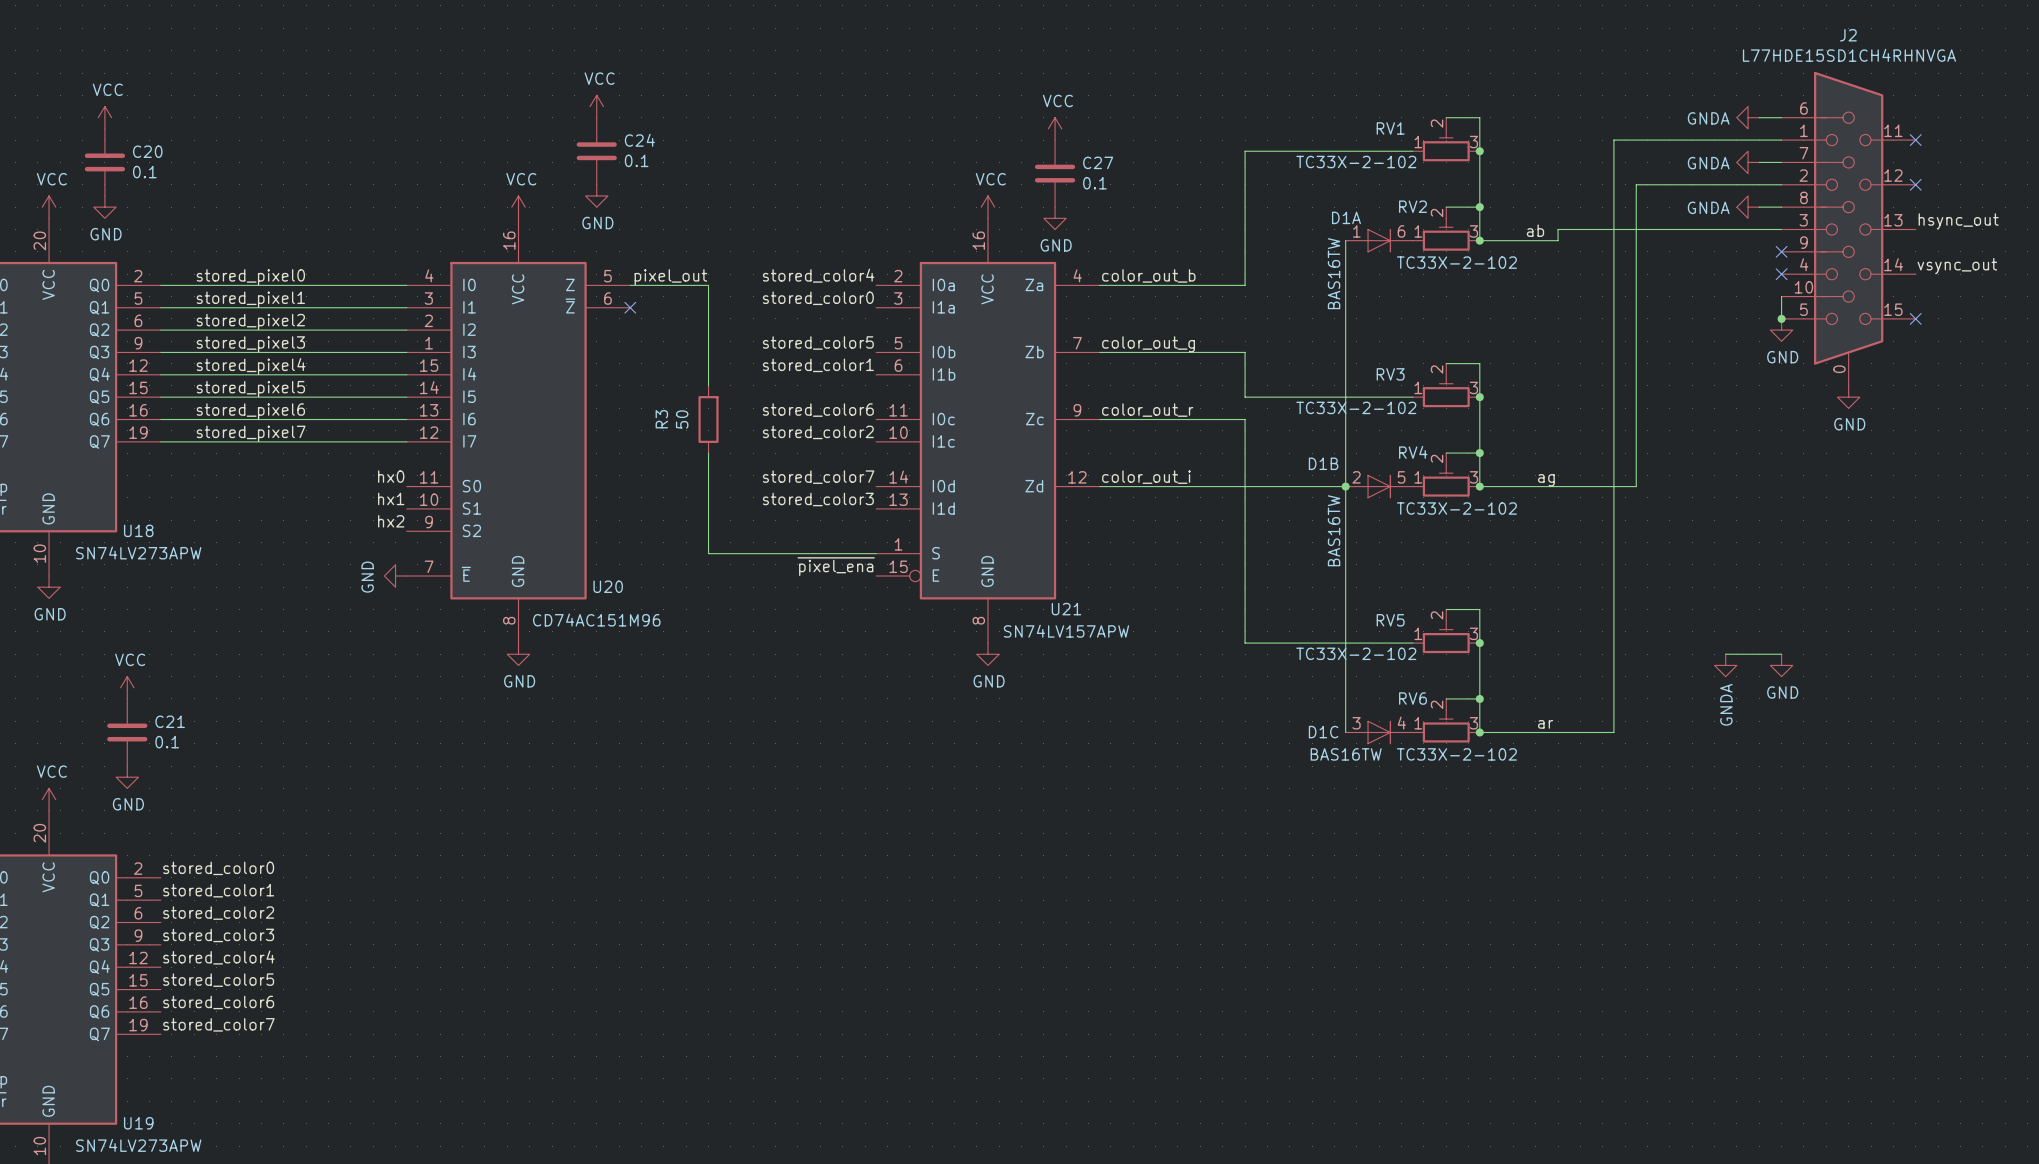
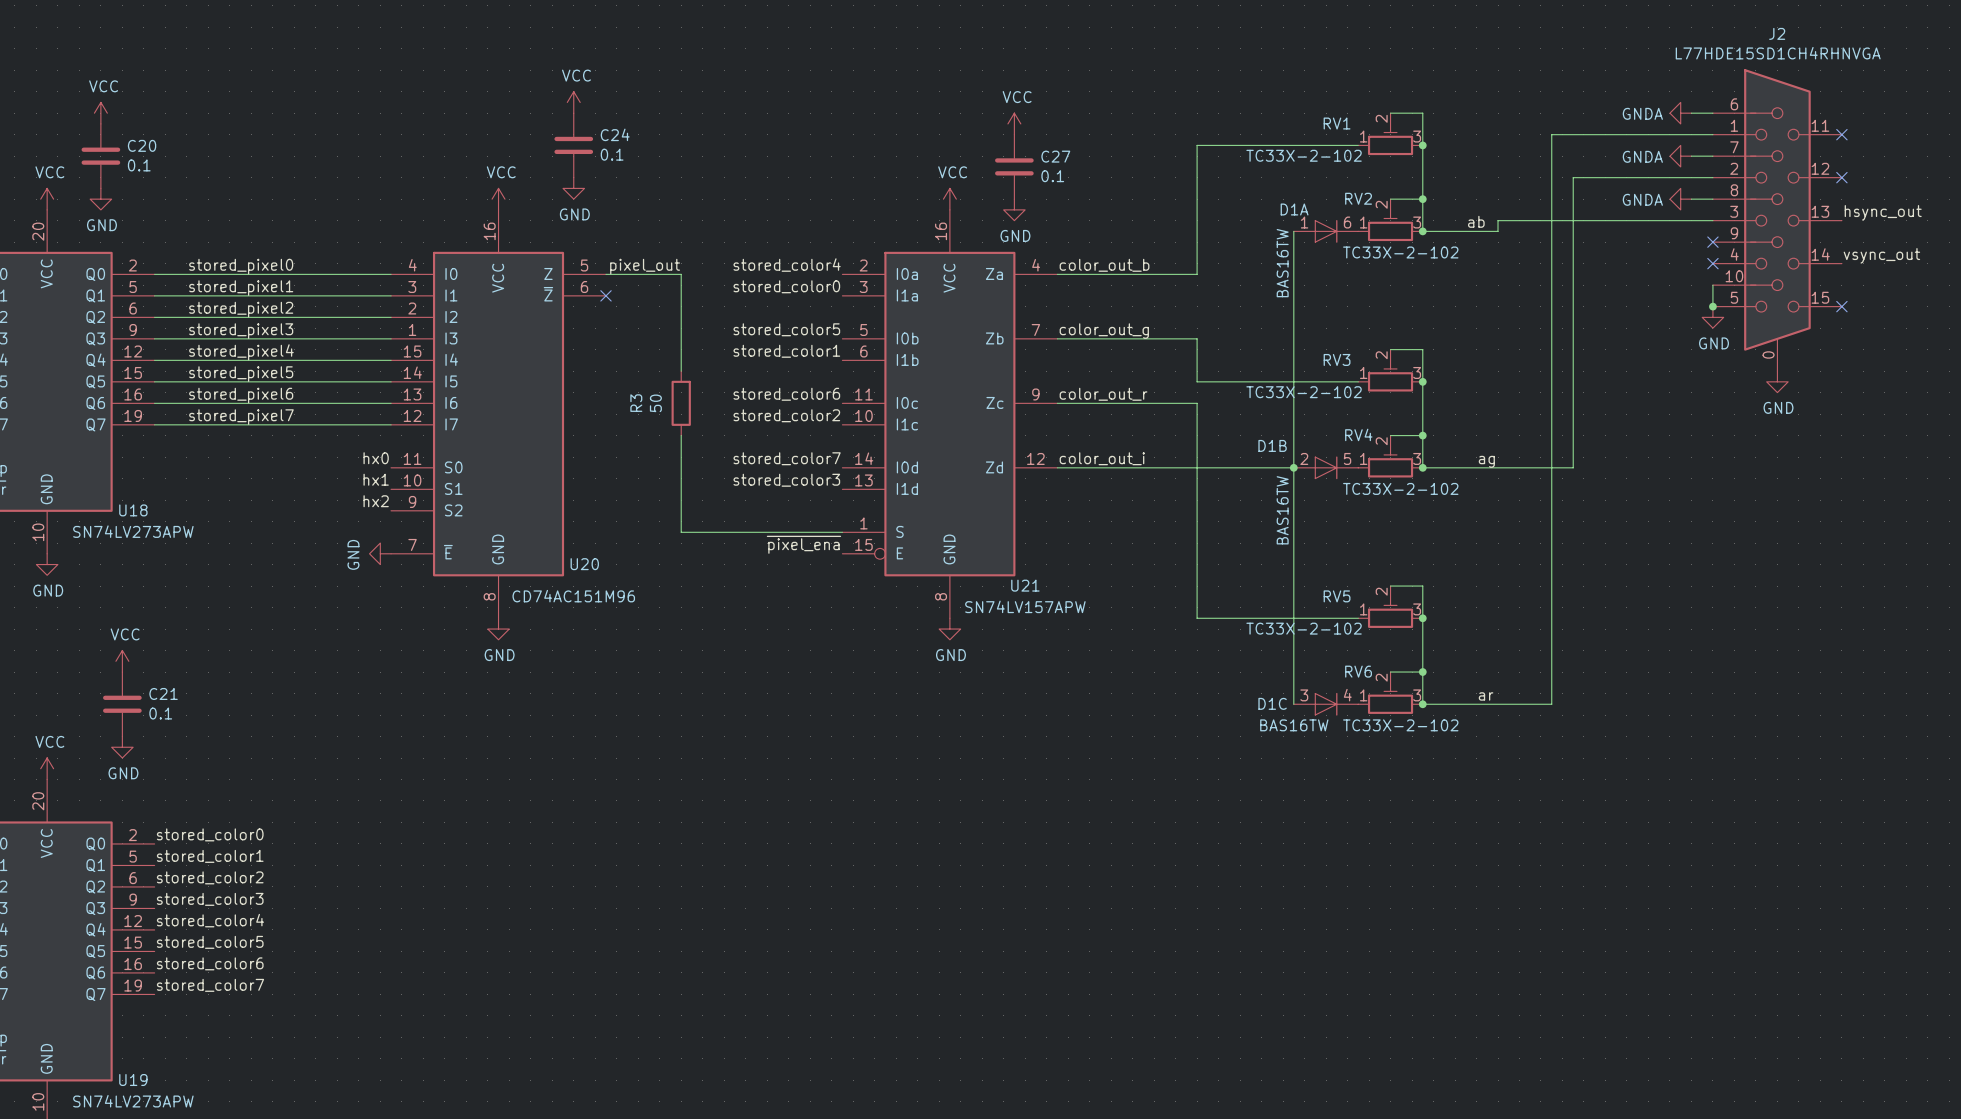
wire: (1725, 654) (1781, 654) -> none
power symbol: GNDA (1725, 665) -> none
power symbol: GND (1781, 665) -> none

